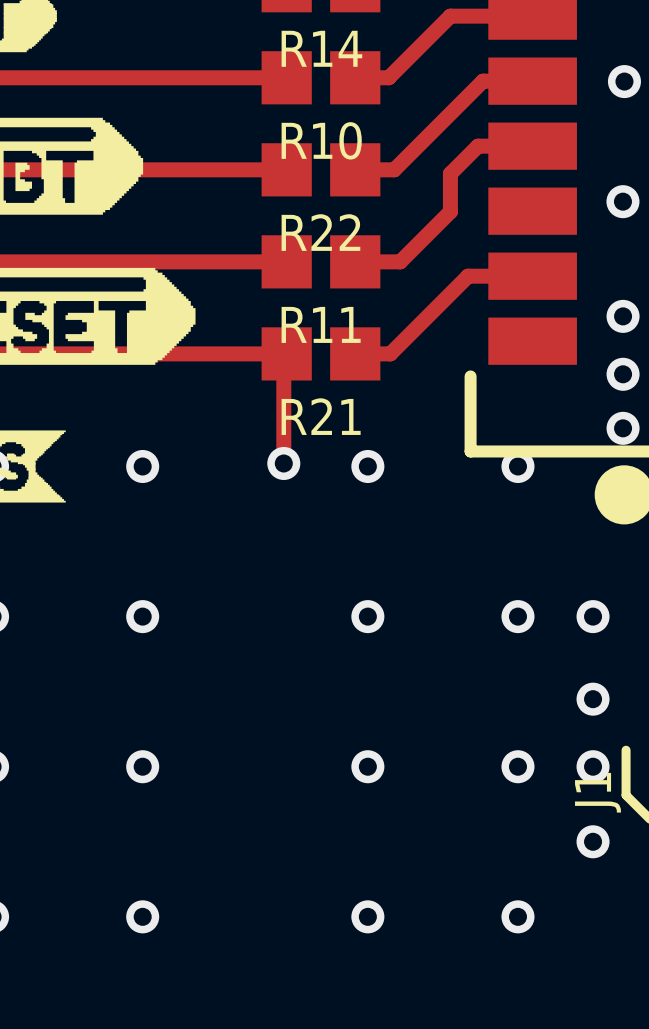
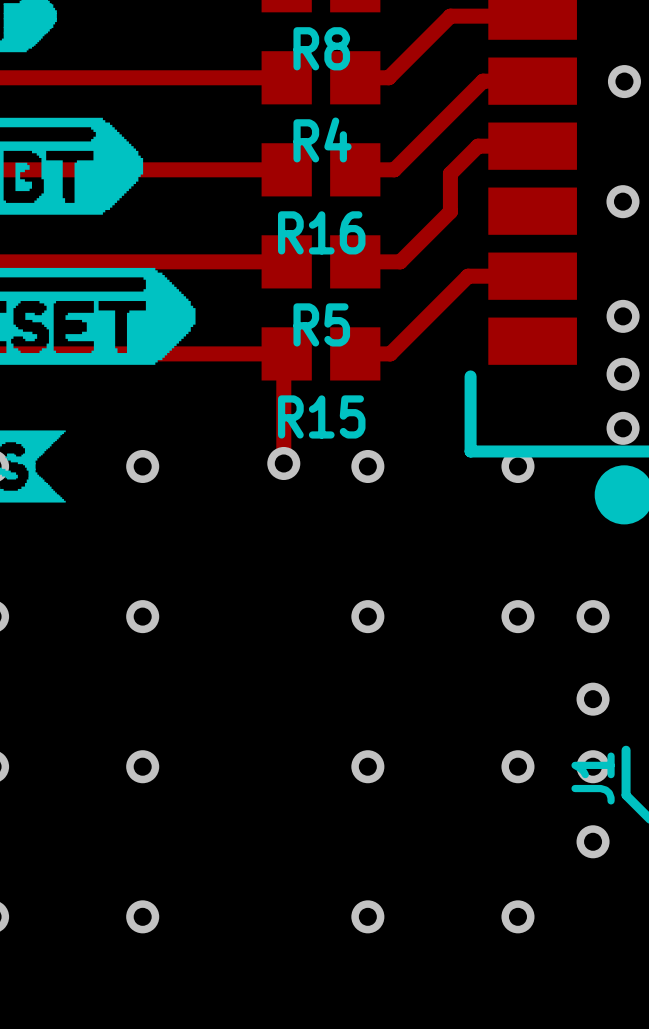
R14 name: R14 (321, 48) -> R8 (321, 48)
R10 name: R10 (321, 140) -> R4 (322, 139)
R22 name: R22 (320, 232) -> R16 (321, 232)
R11 name: R11 (321, 324) -> R5 (321, 324)
R21 name: R21 (321, 416) -> R15 (321, 416)

